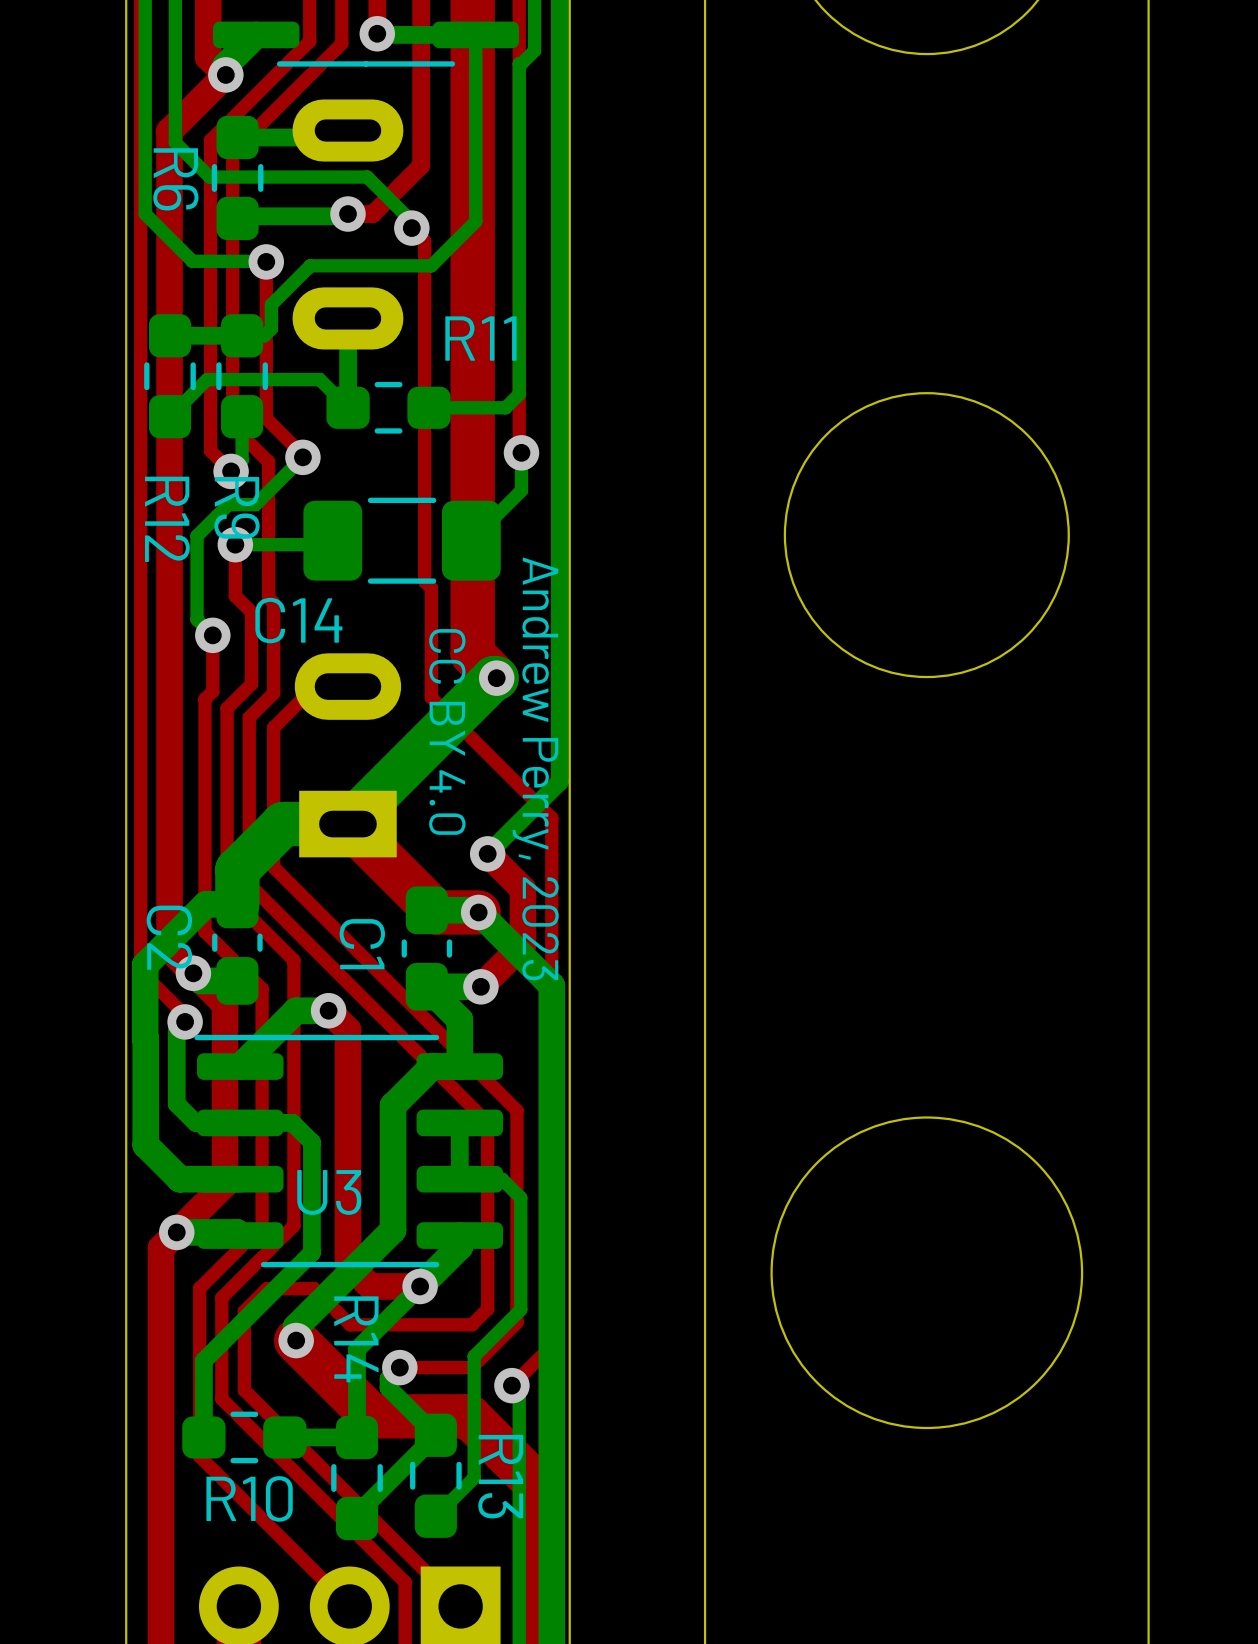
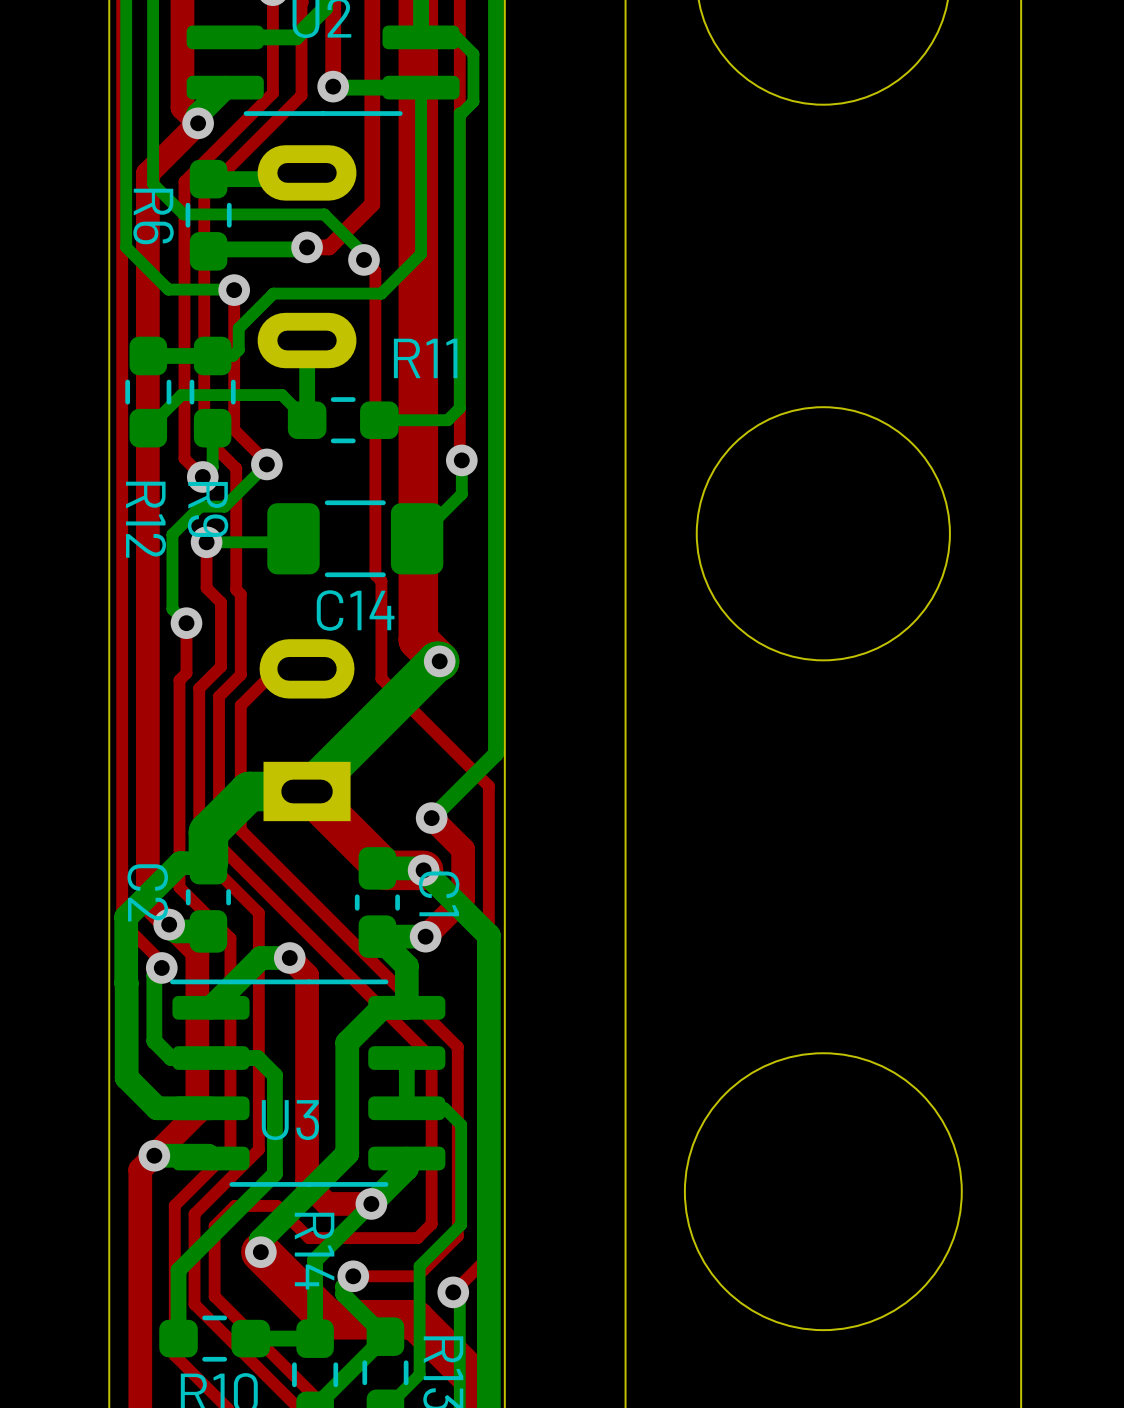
C14 name position: C14 (298, 620) -> C14 (355, 610)
text: CC BY 4.0 (447, 731) -> none
text: Andrew Perry, 2023 (535, 768) -> none
C1 name position: C1 (362, 944) -> C1 (439, 893)

